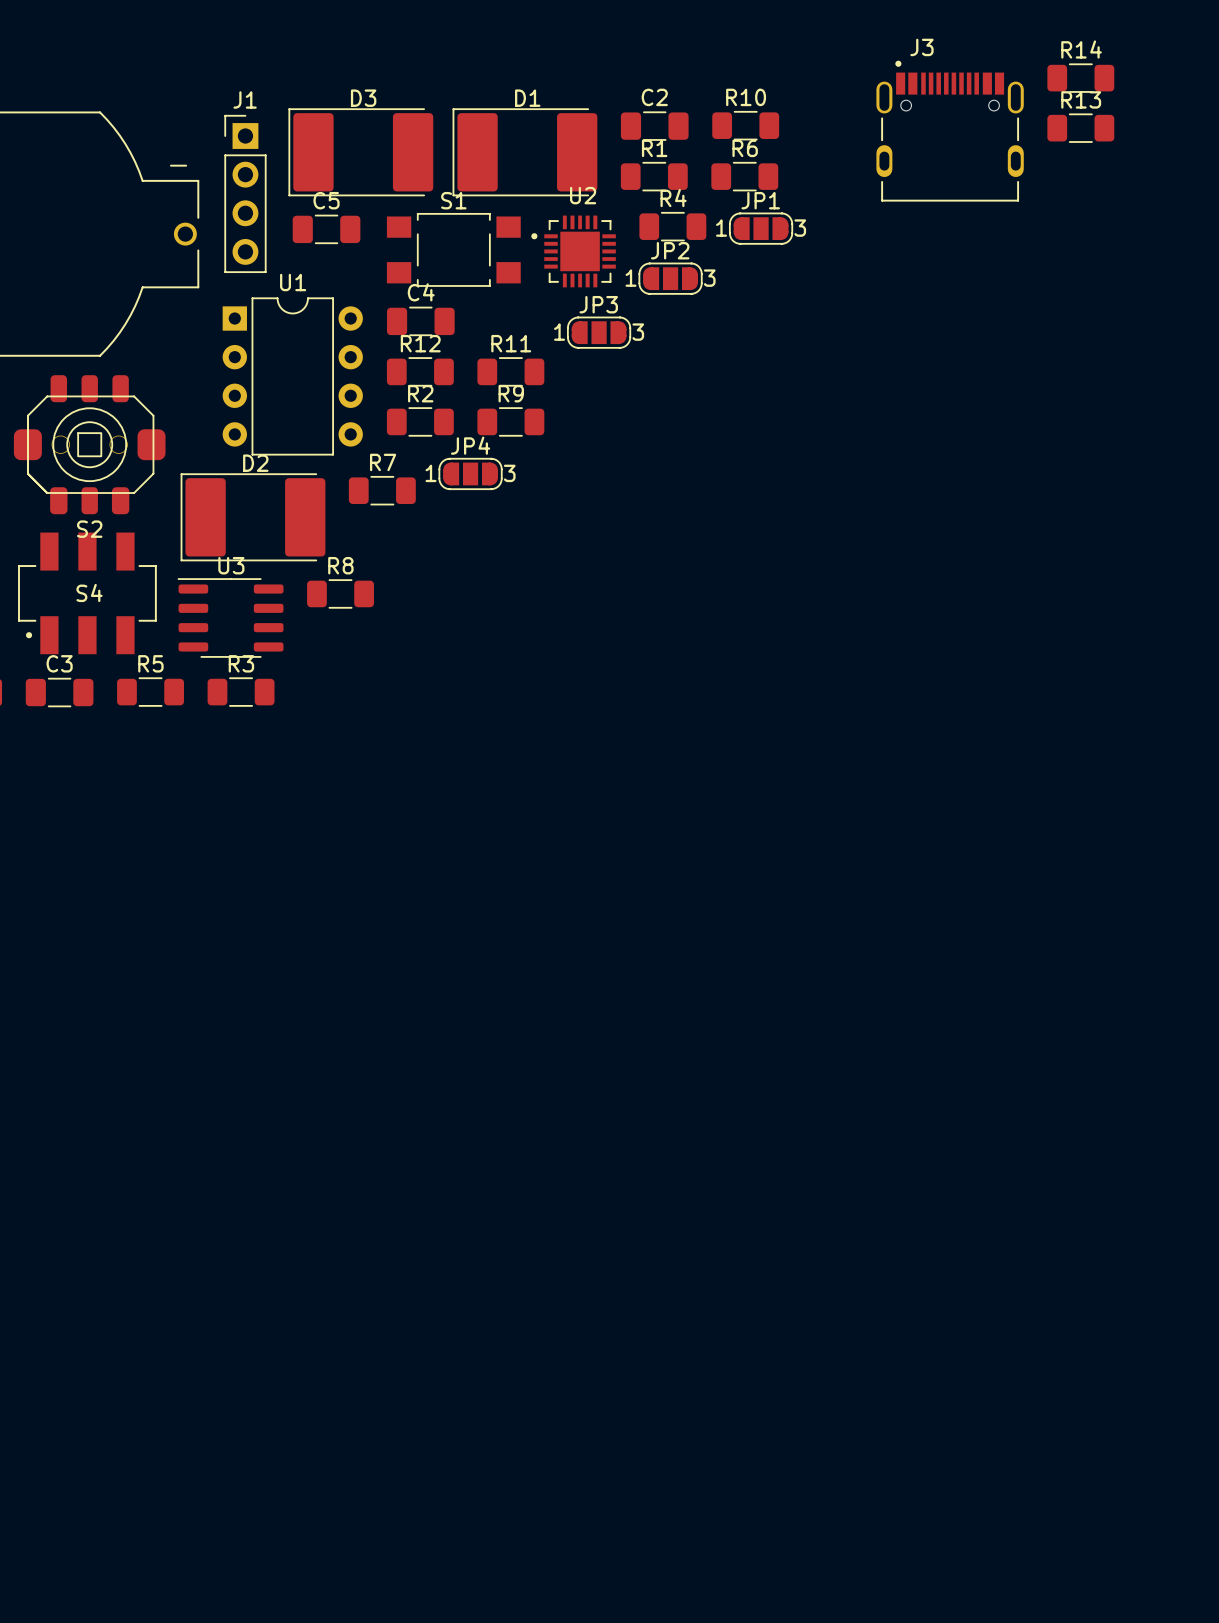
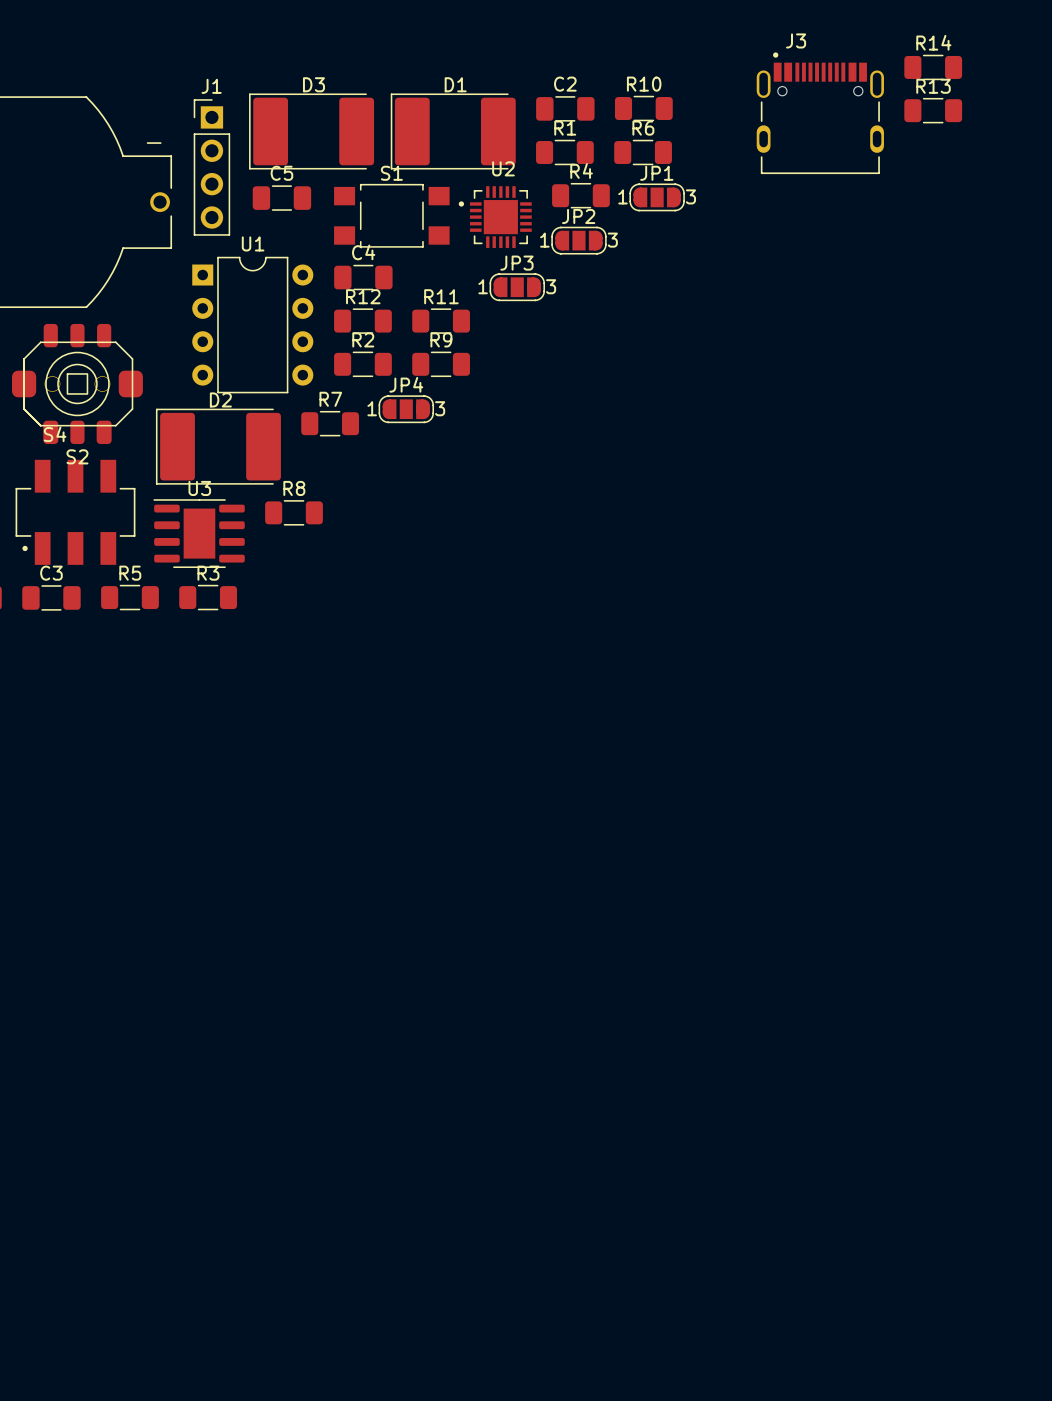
U3 footprint: [177, 578, 284, 658] -> [153, 499, 245, 569]
S4 name position: S4 (89, 592) -> S4 (55, 434)

